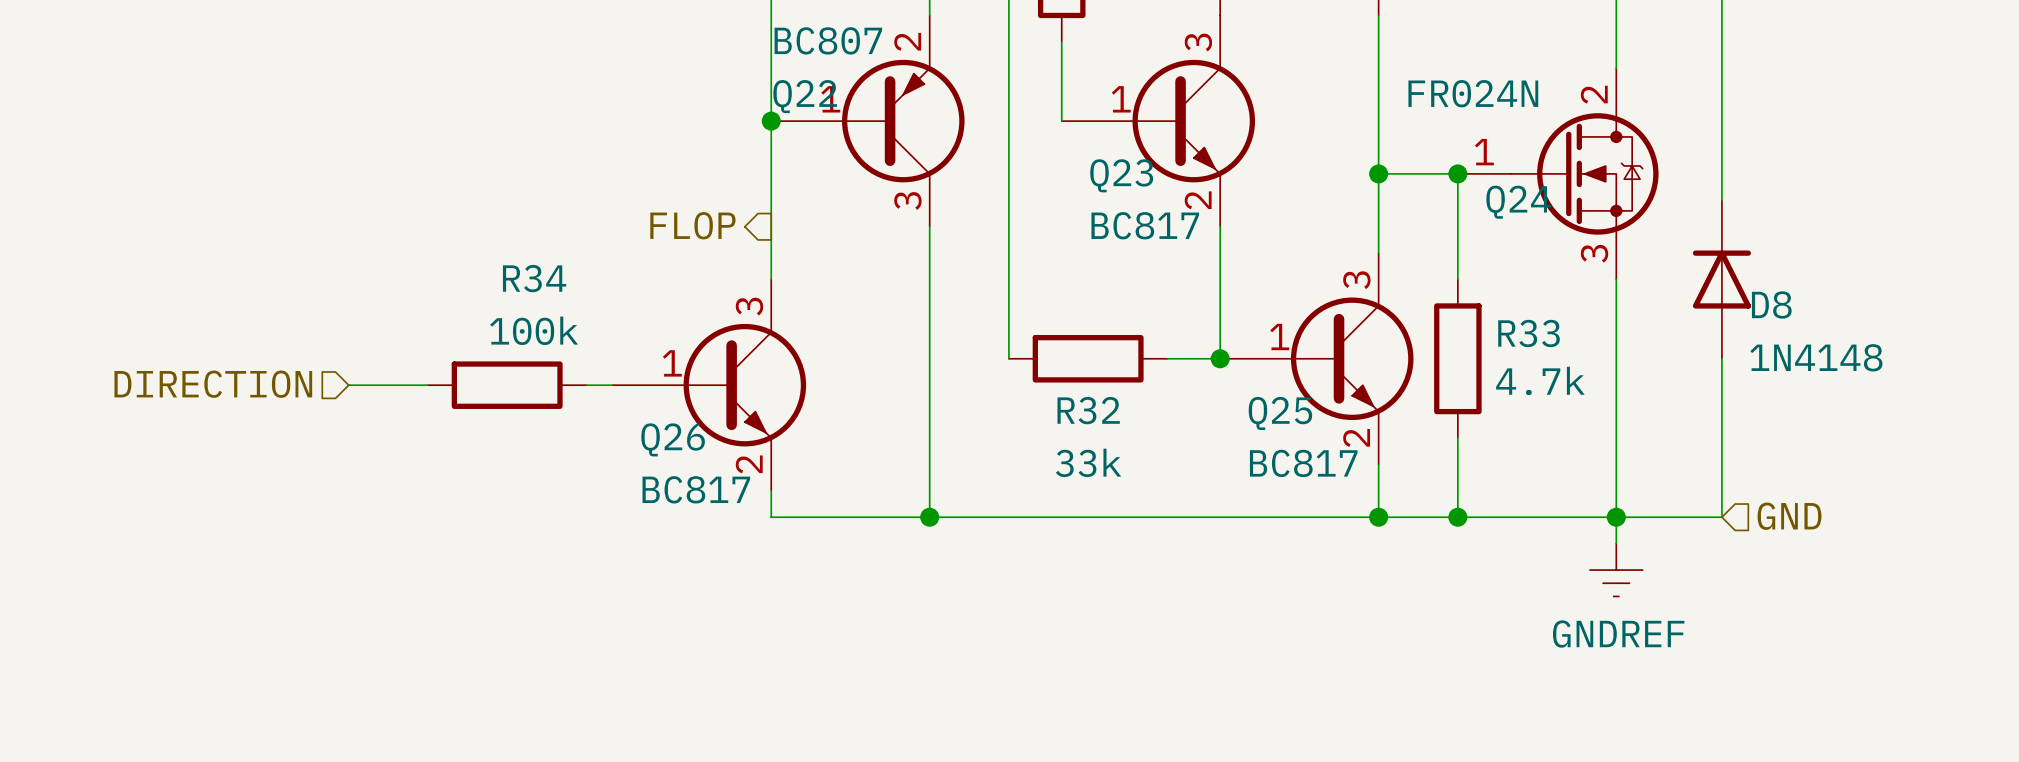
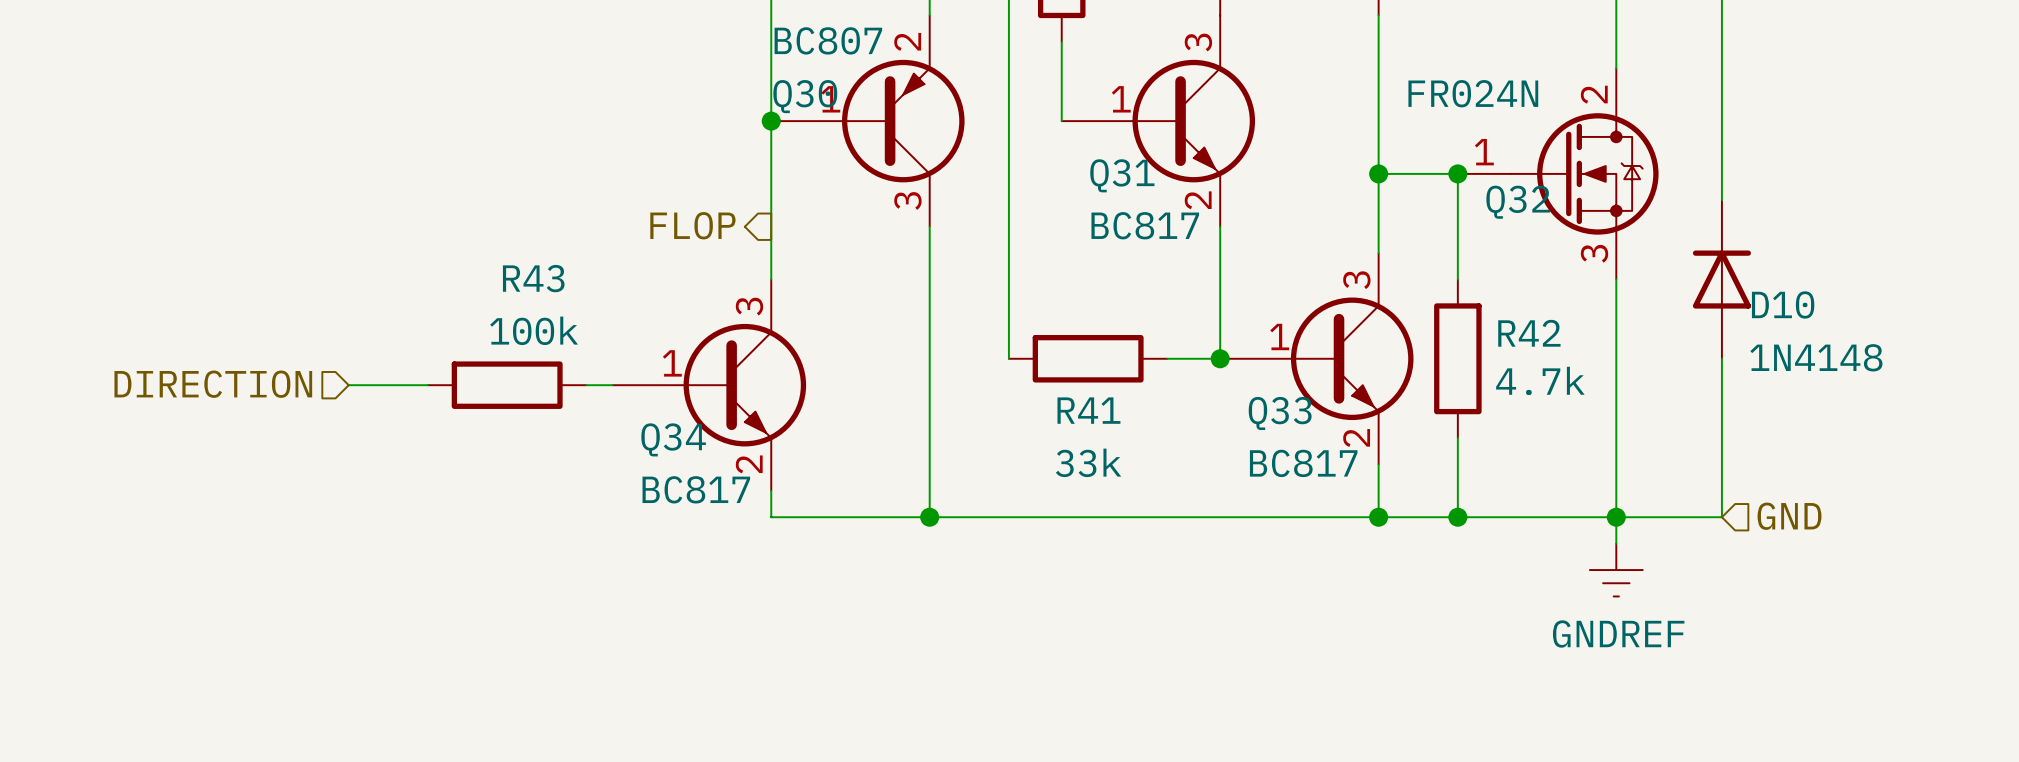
Q22 name: Q22 (805, 96) -> Q30 (805, 96)
Q23 name: Q23 (1121, 175) -> Q31 (1122, 175)
Q24 name: Q24 (1518, 202) -> Q32 (1518, 202)
R34 name: R34 (534, 278) -> R43 (533, 278)
D8 name: D8 (1771, 304) -> D10 (1783, 304)
R33 name: R33 (1529, 333) -> R42 (1529, 333)
R32 name: R32 (1088, 410) -> R41 (1088, 410)
Q25 name: Q25 (1280, 413) -> Q33 (1280, 413)
Q26 name: Q26 (673, 439) -> Q34 (673, 439)

